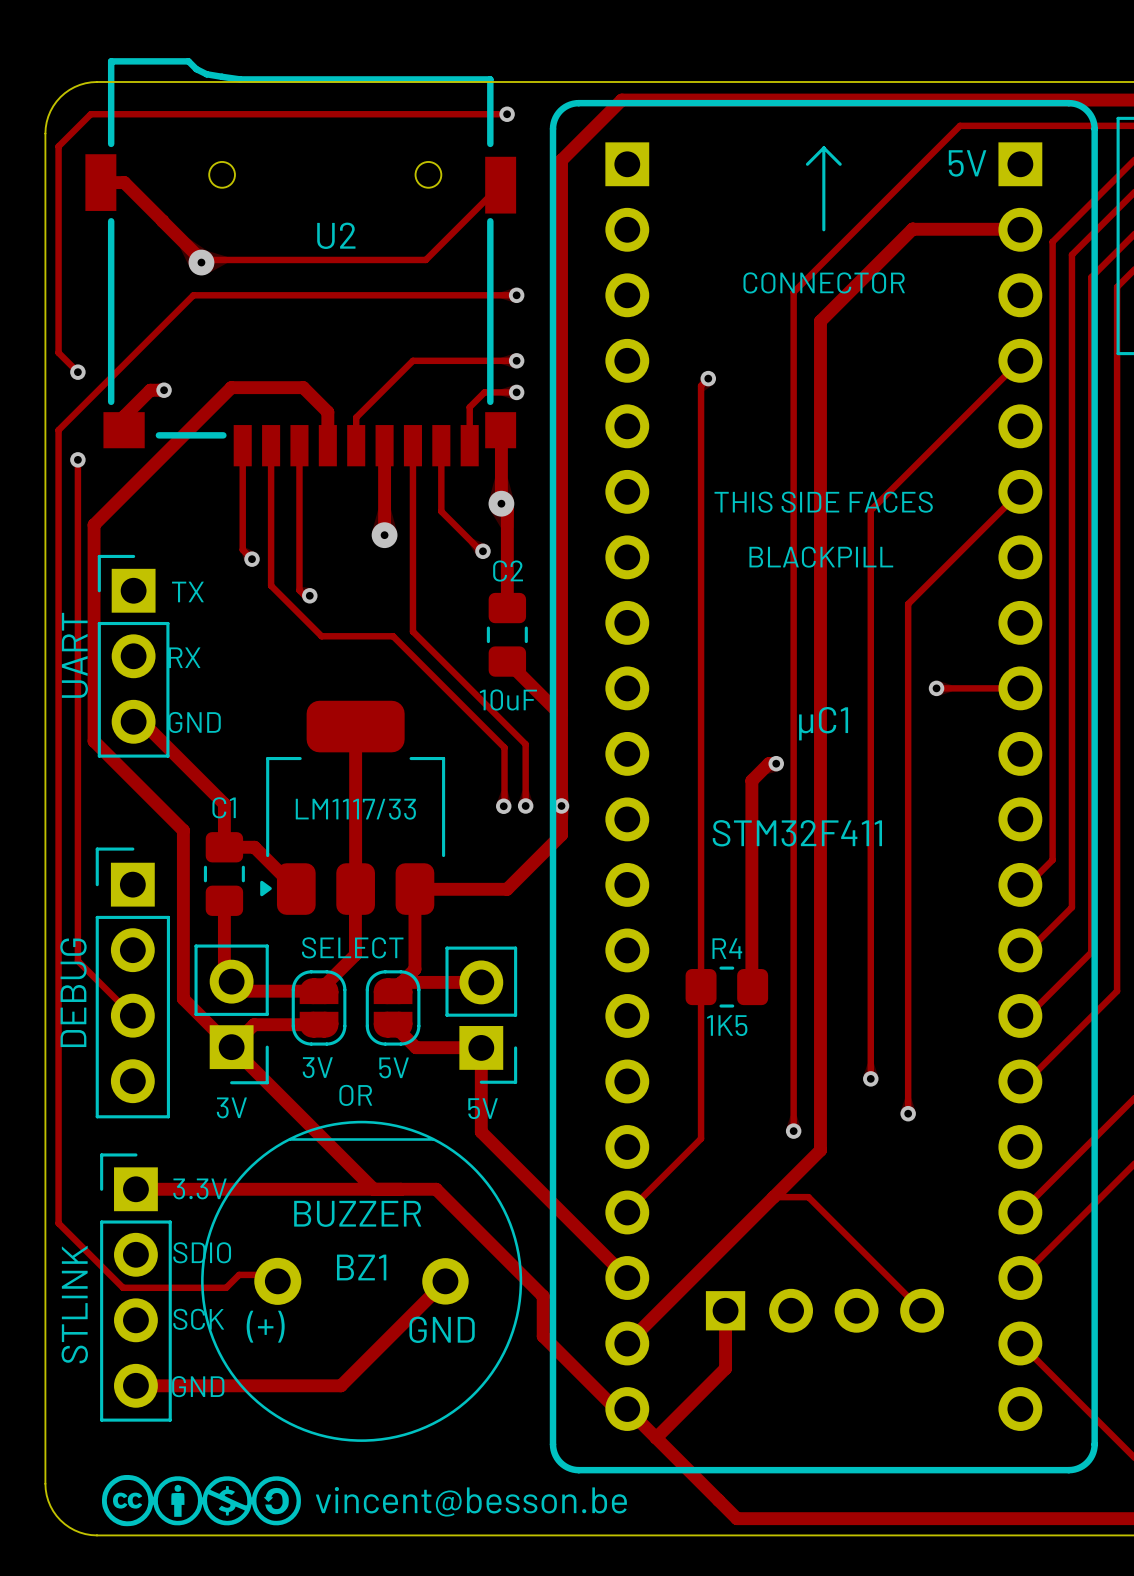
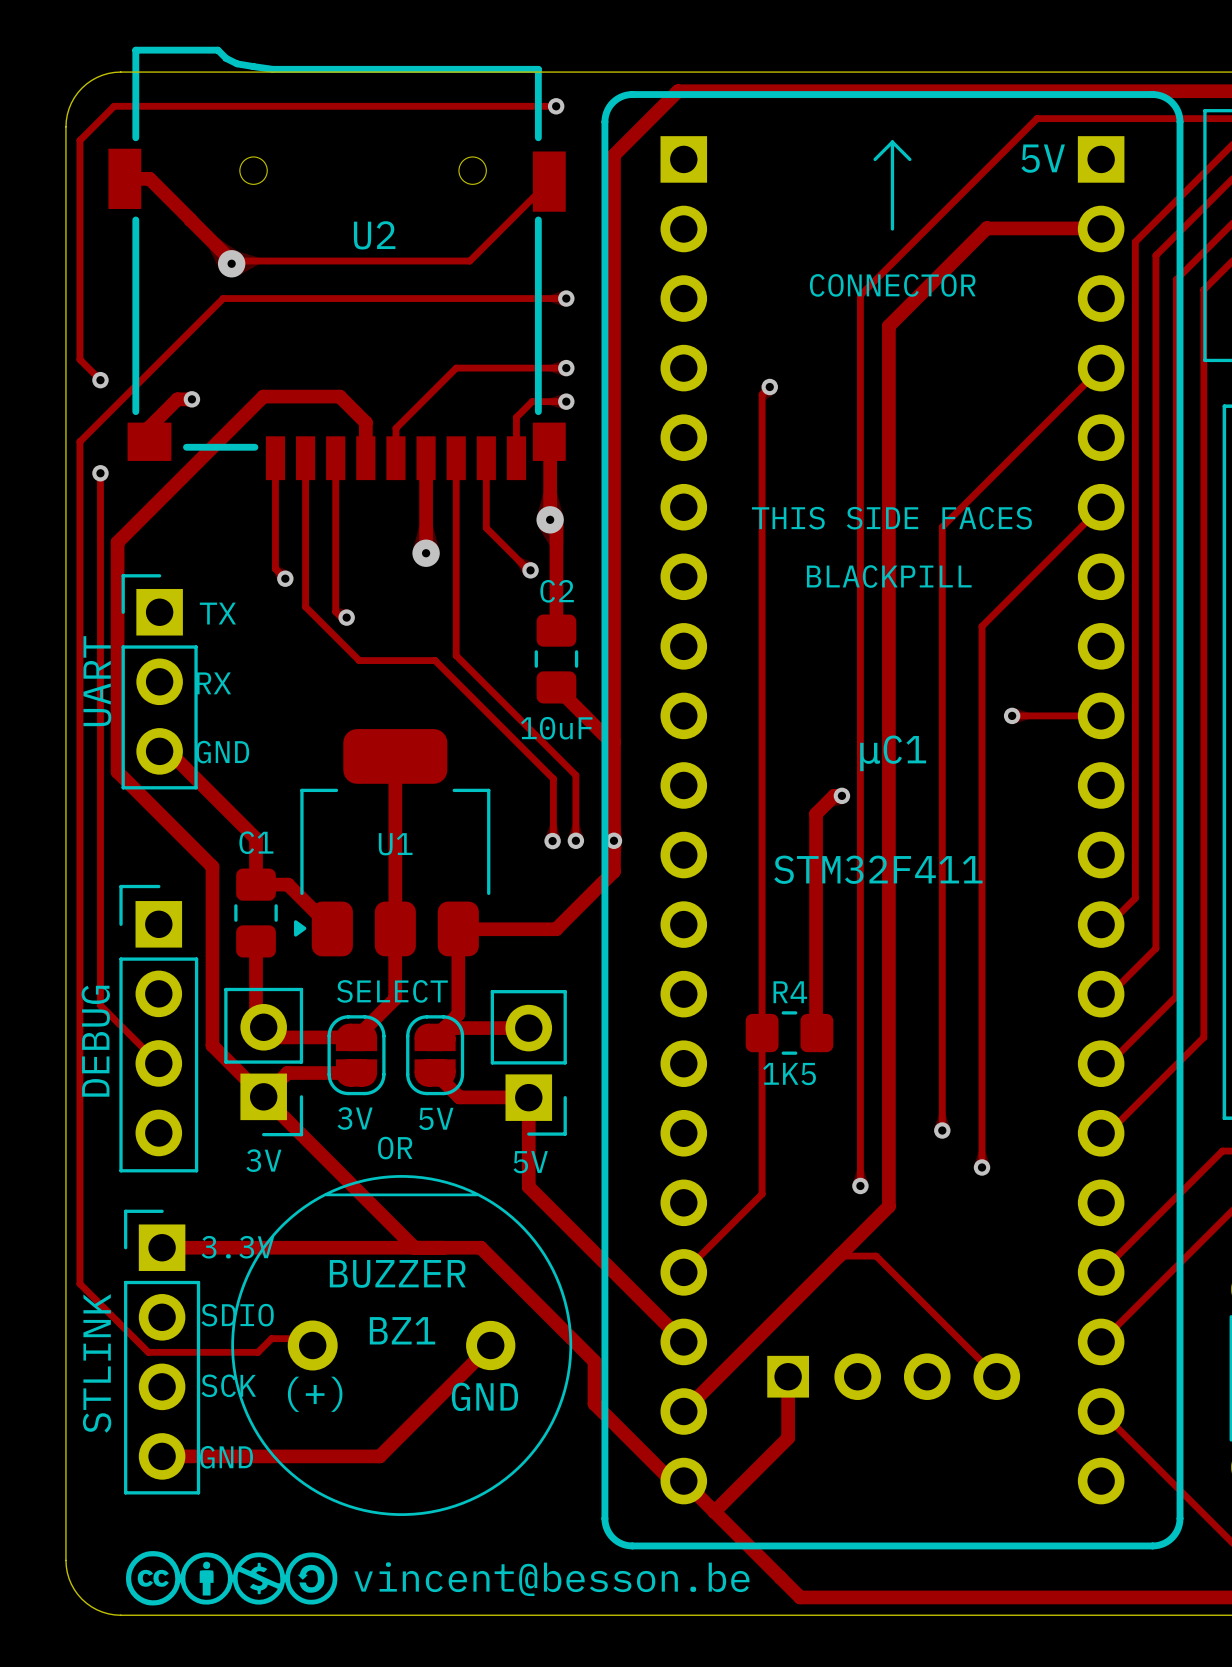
LM1117/33 name: LM1117/33 (355, 809) -> U1 (395, 844)
3V name: 3V (231, 1107) -> none
text: none -> 3V (263, 1160)

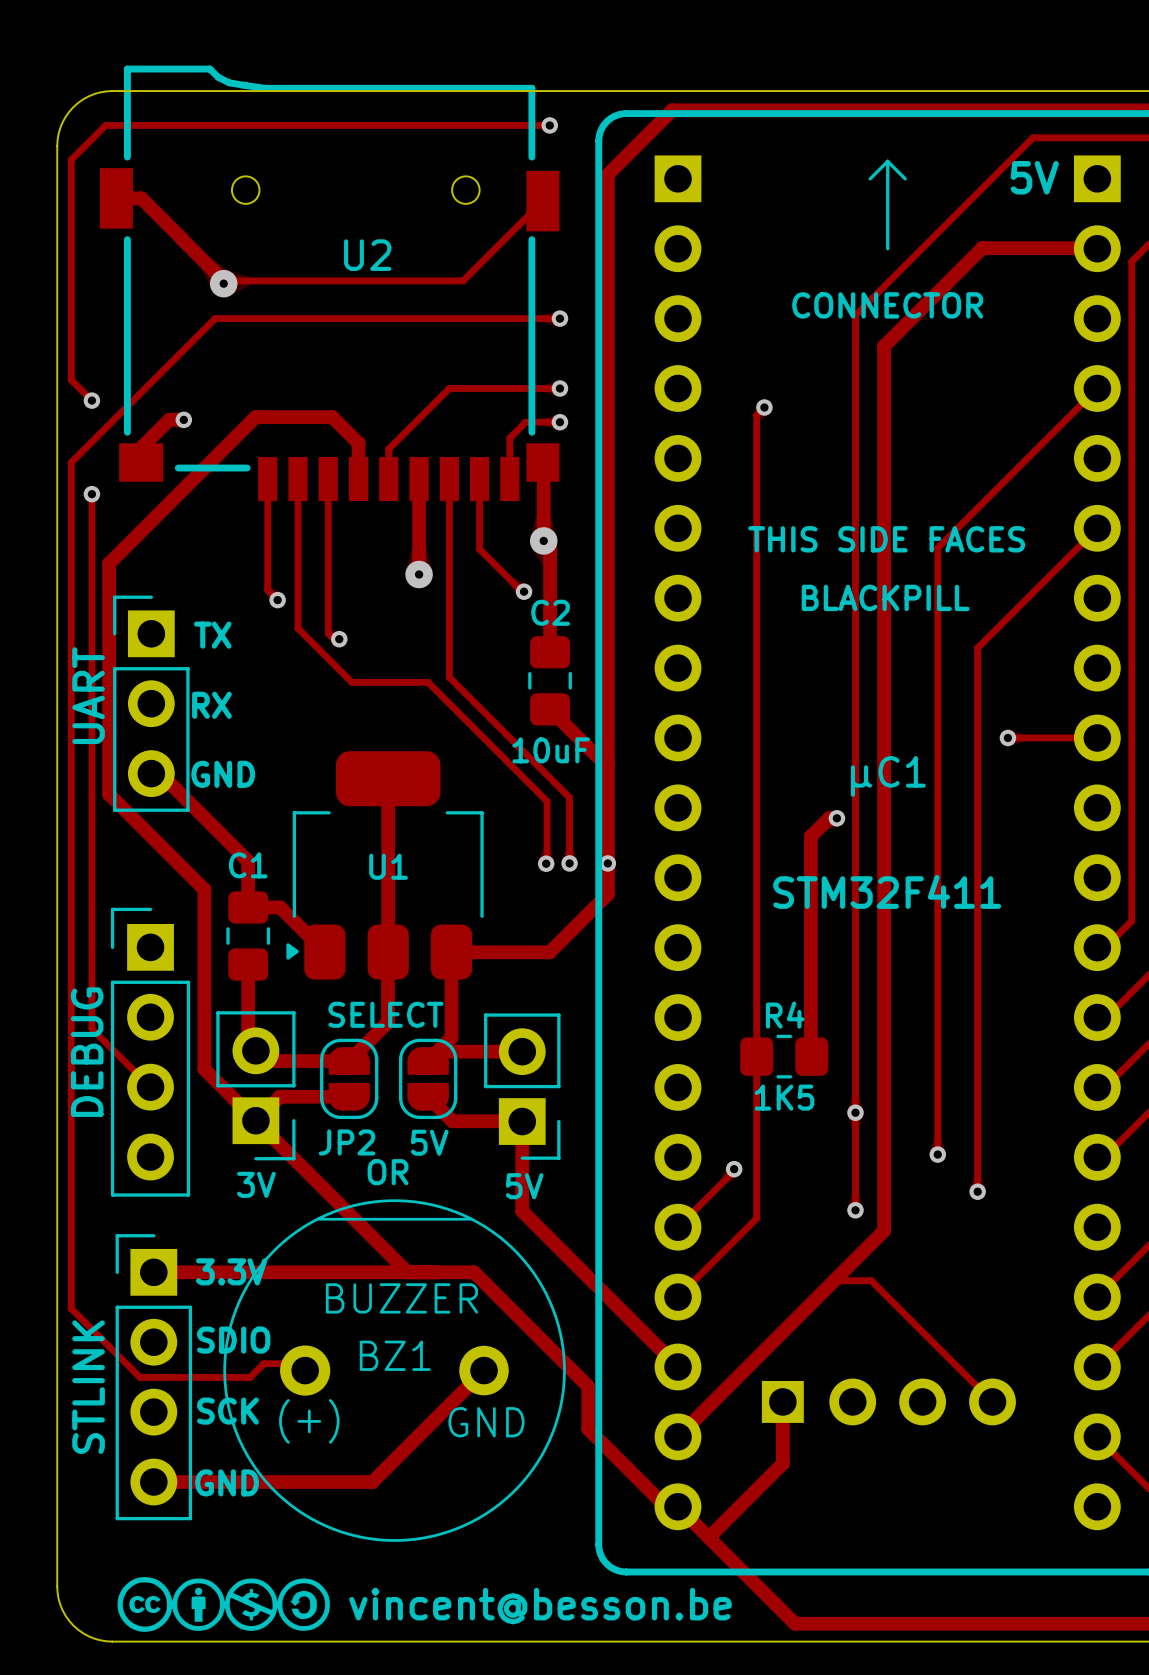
via: none -> (855, 1112)
3V name: 3V (355, 1118) -> JP2 (347, 1142)
track: none -> (734, 1169) (734, 1173) (678, 1227)
via: none -> (734, 1169)

